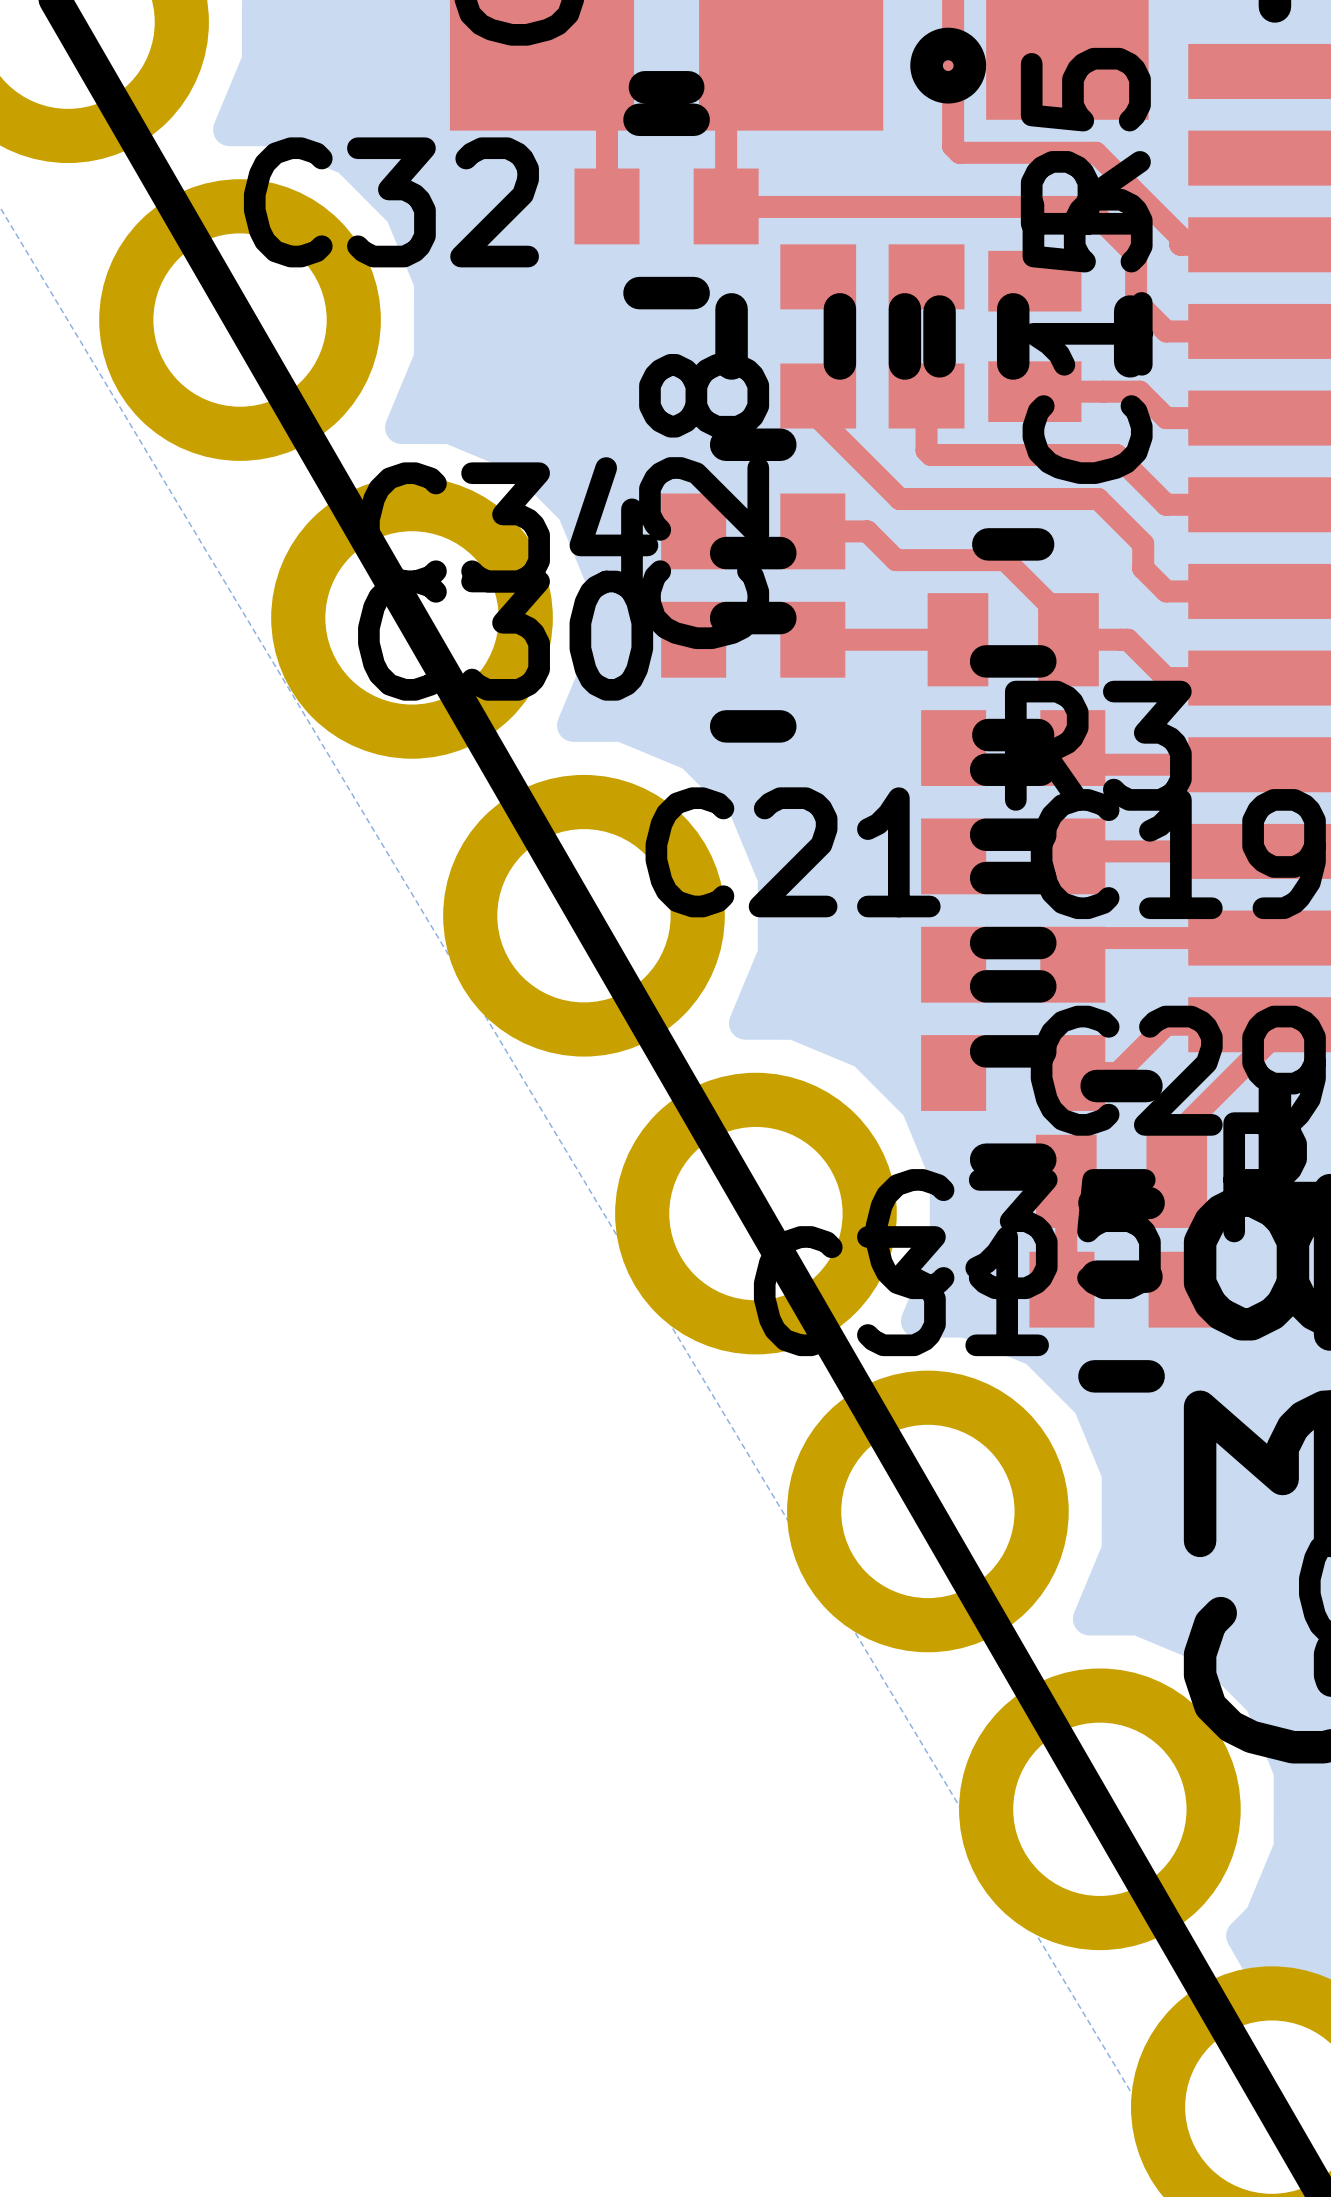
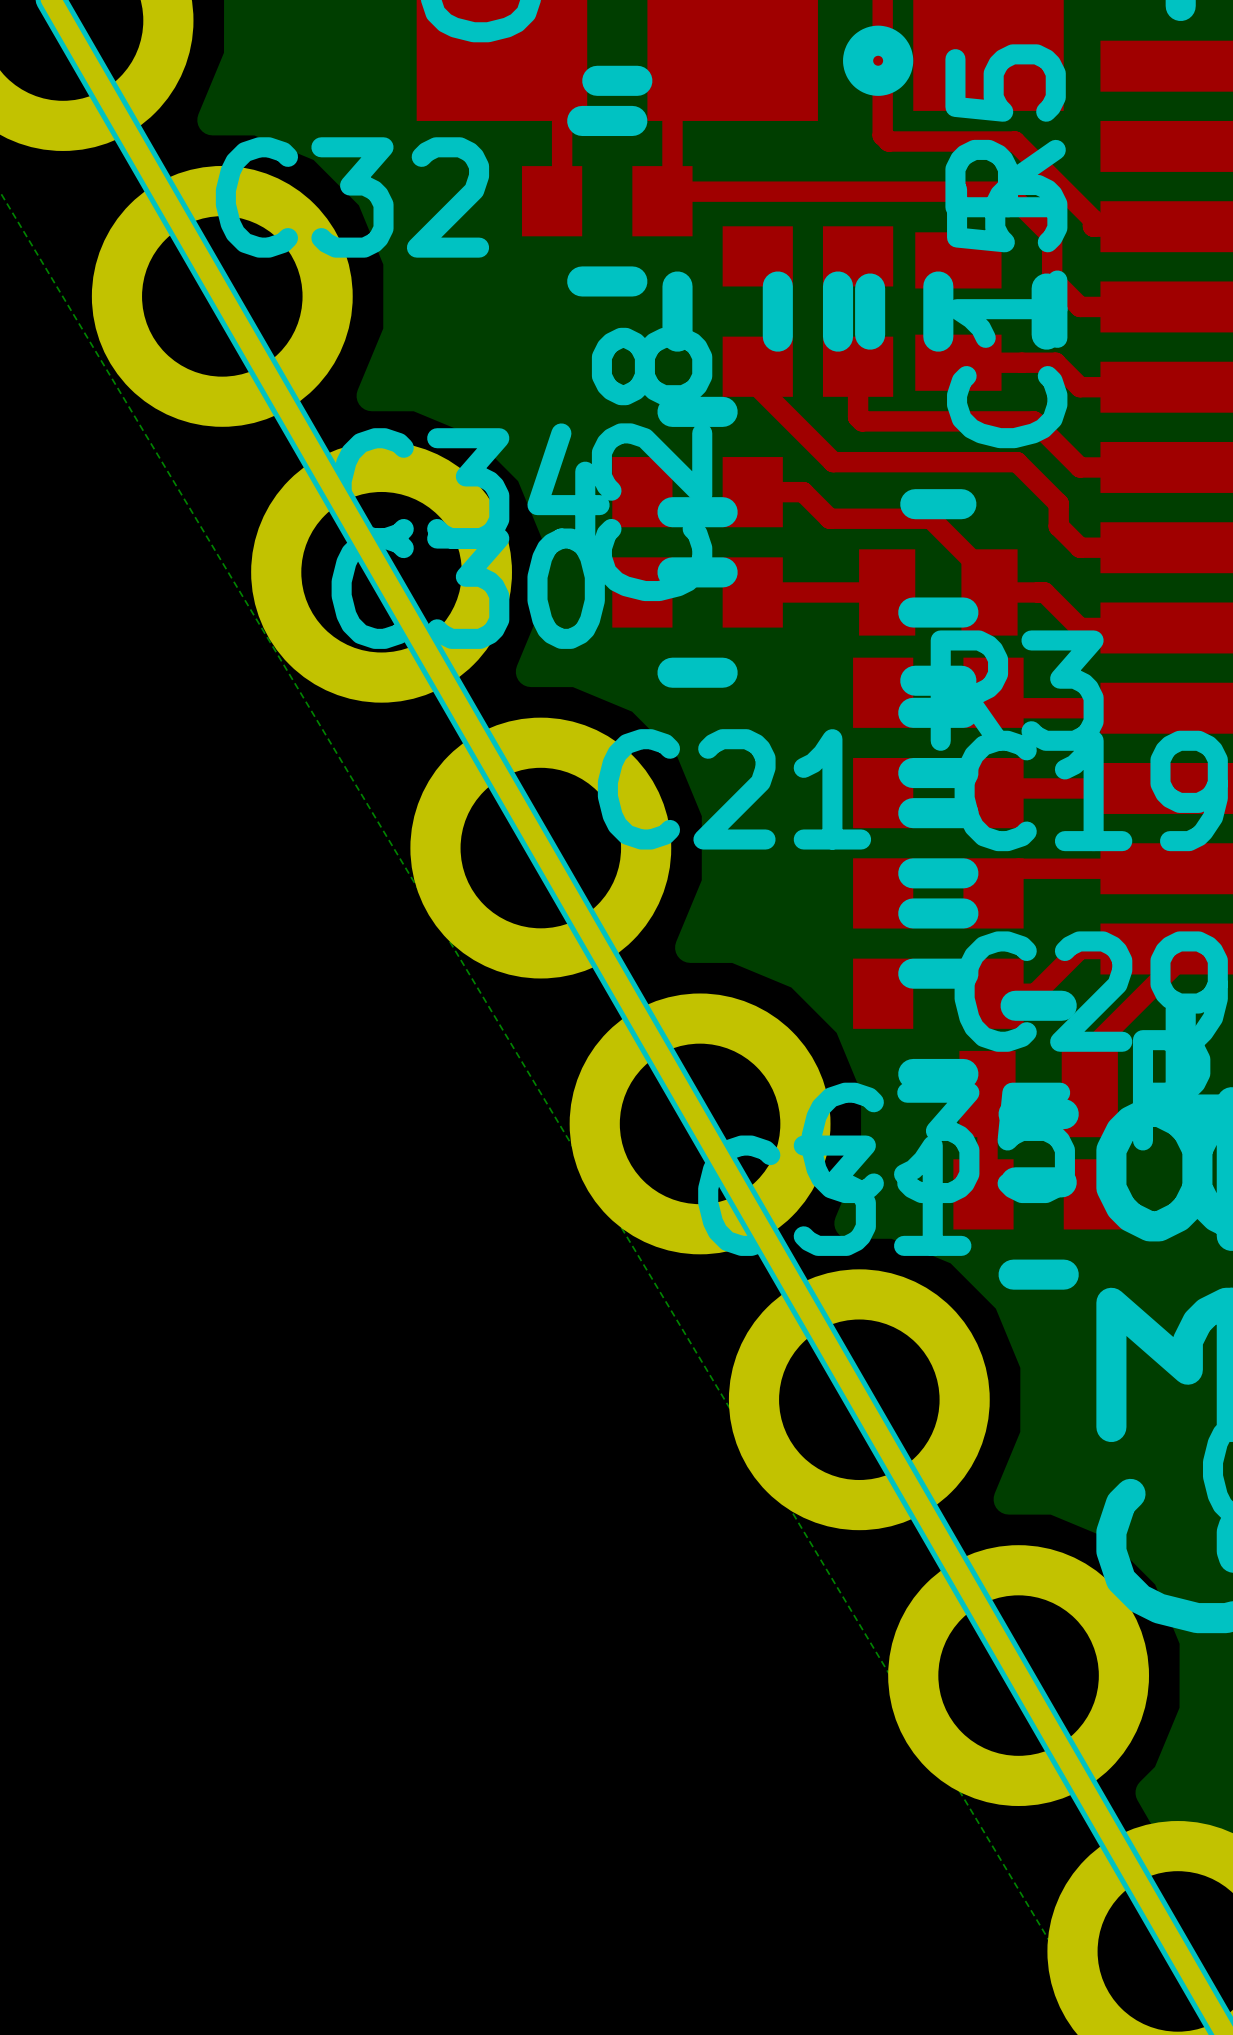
C32 position: (666, 206) -> (607, 201)

